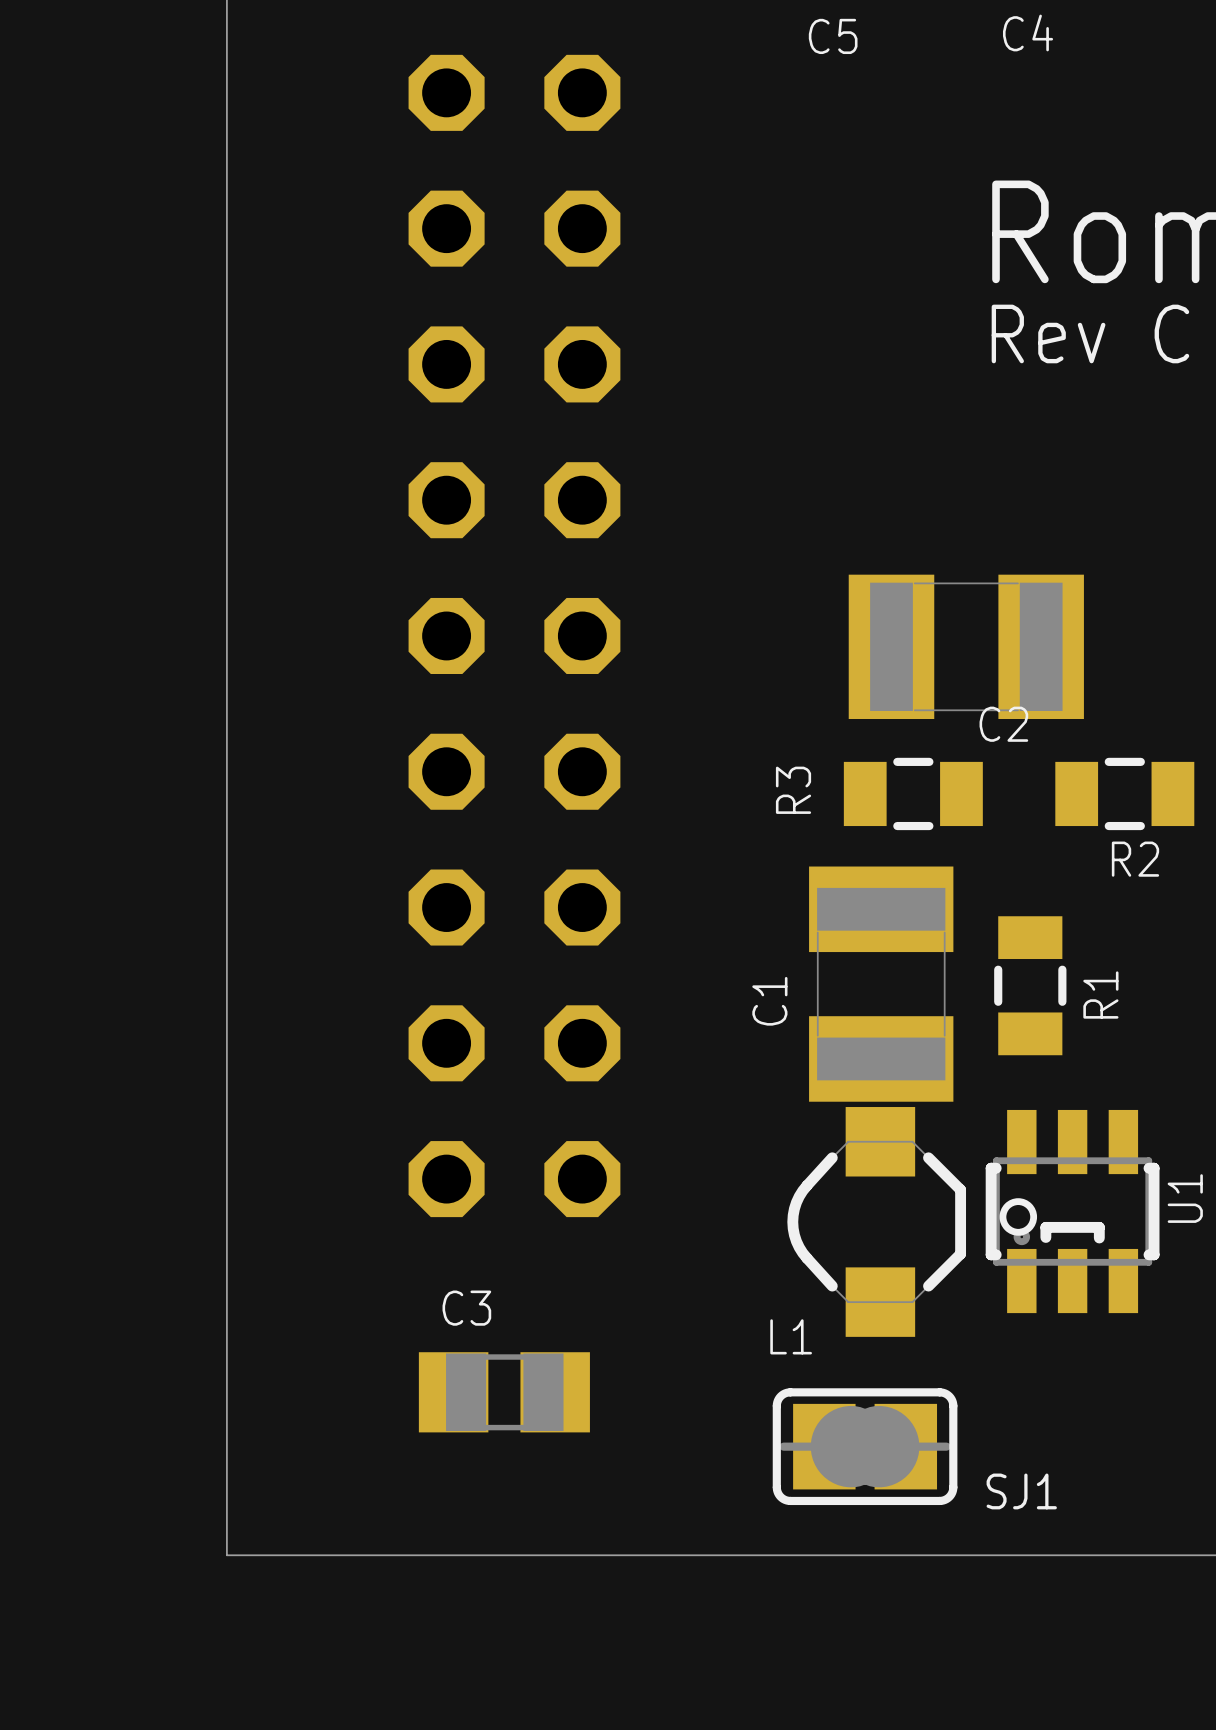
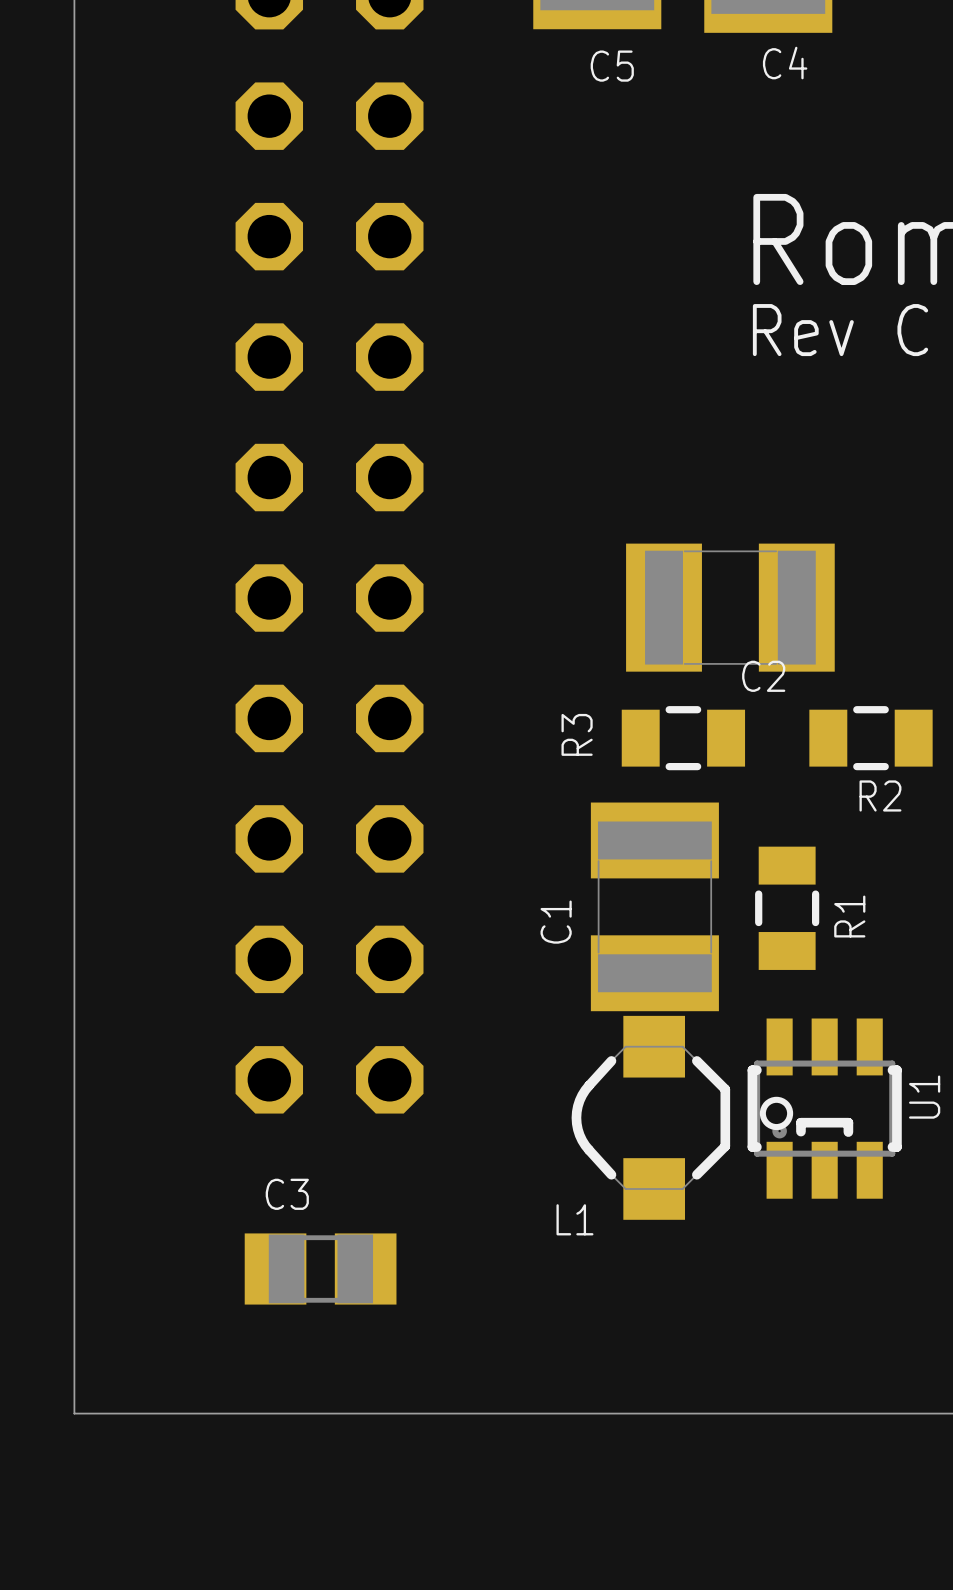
SJ1: (865, 1446) -> none

